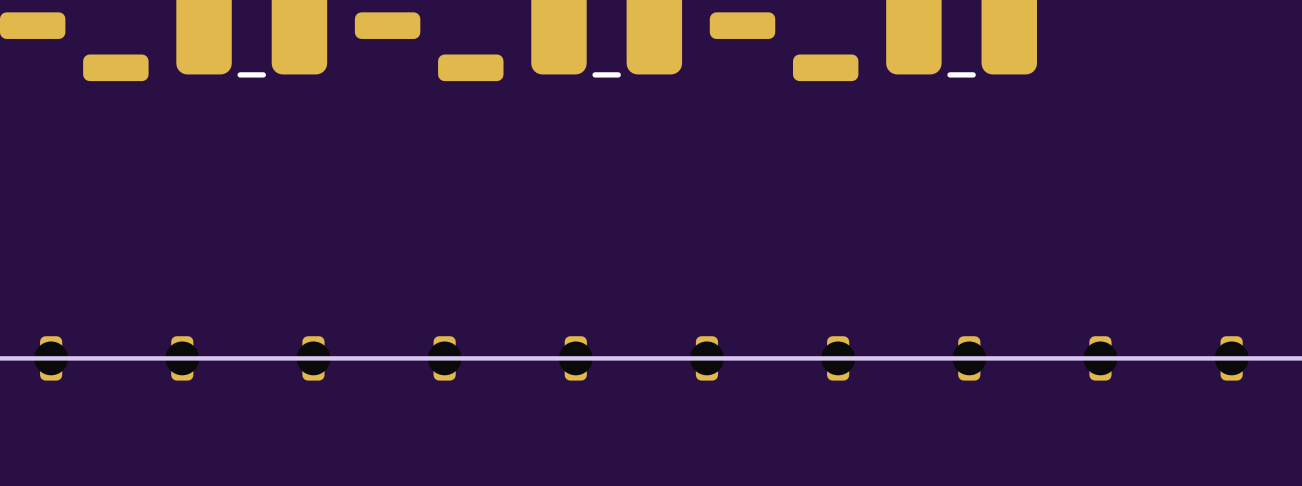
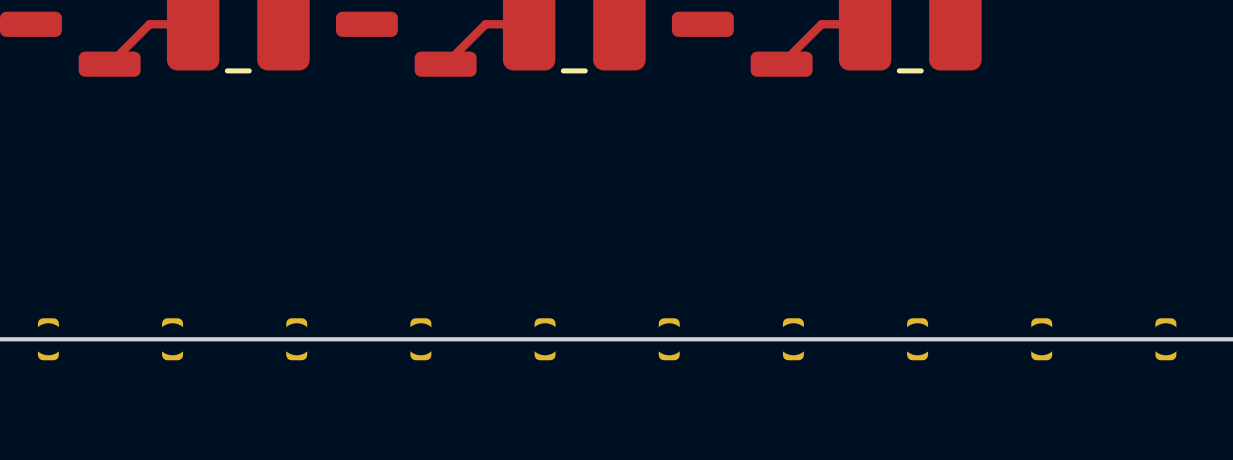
track: none -> (193, 24) (149, 24) (109, 64)
track: none -> (529, 24) (485, 24) (445, 64)
track: none -> (865, 24) (821, 24) (781, 64)

